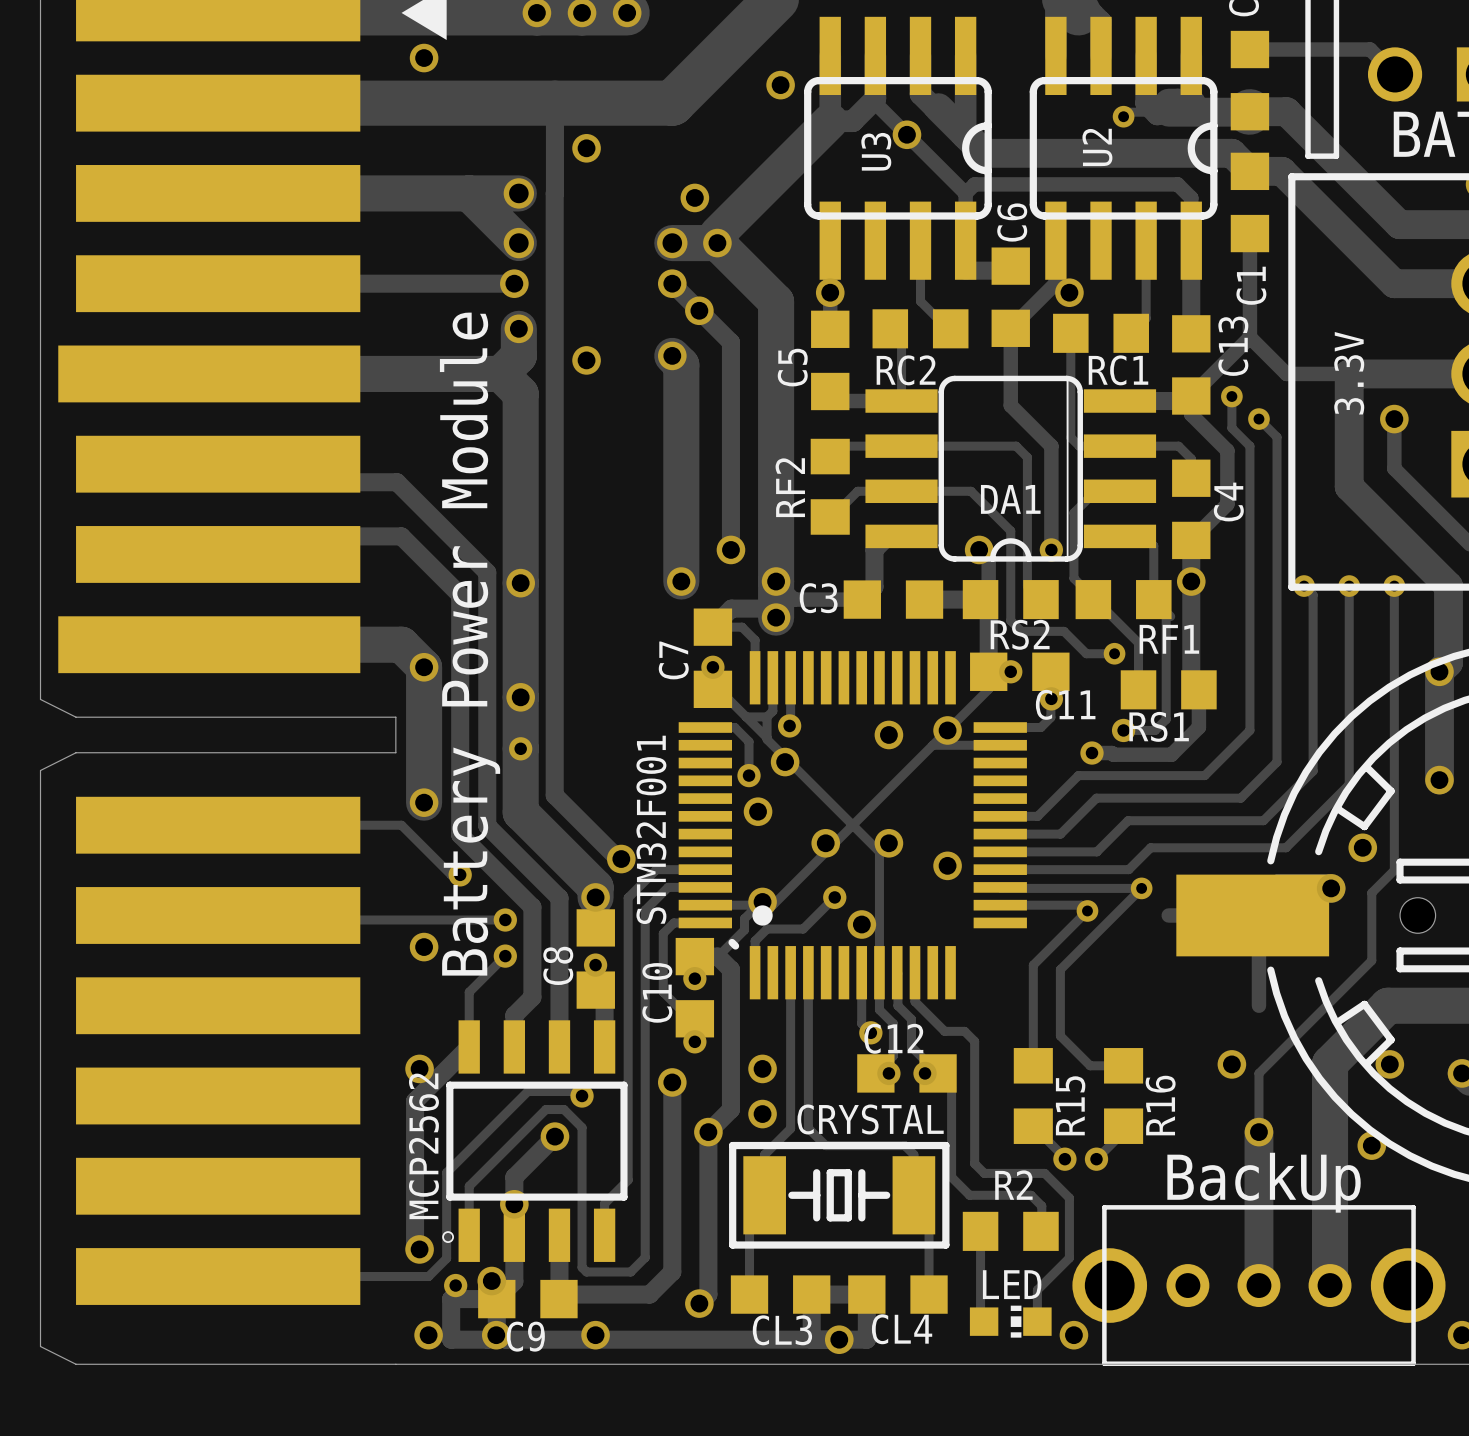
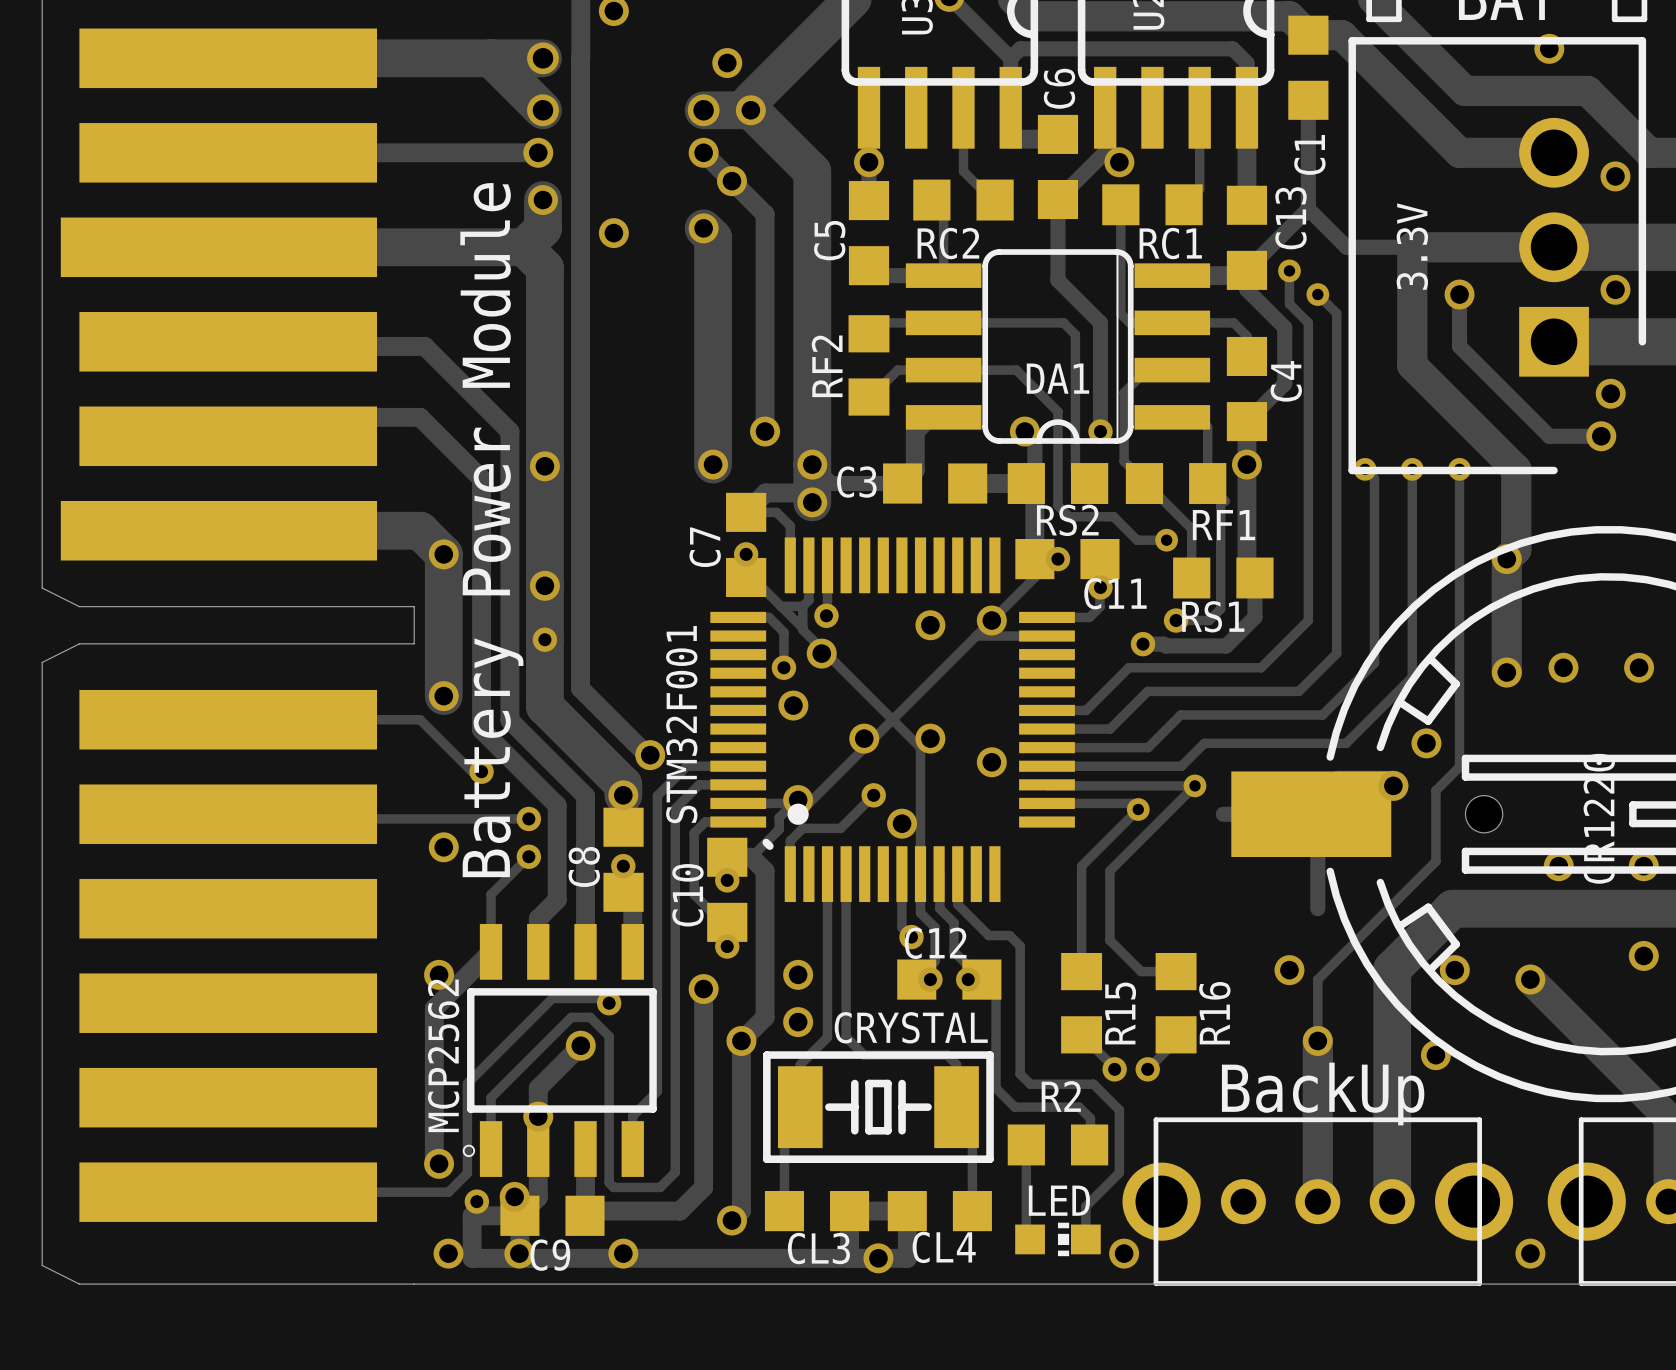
track: (222, 468) (236, 482) (397, 482) (487, 572) -> (232, 346) (424, 346) (509, 431) (509, 455)

